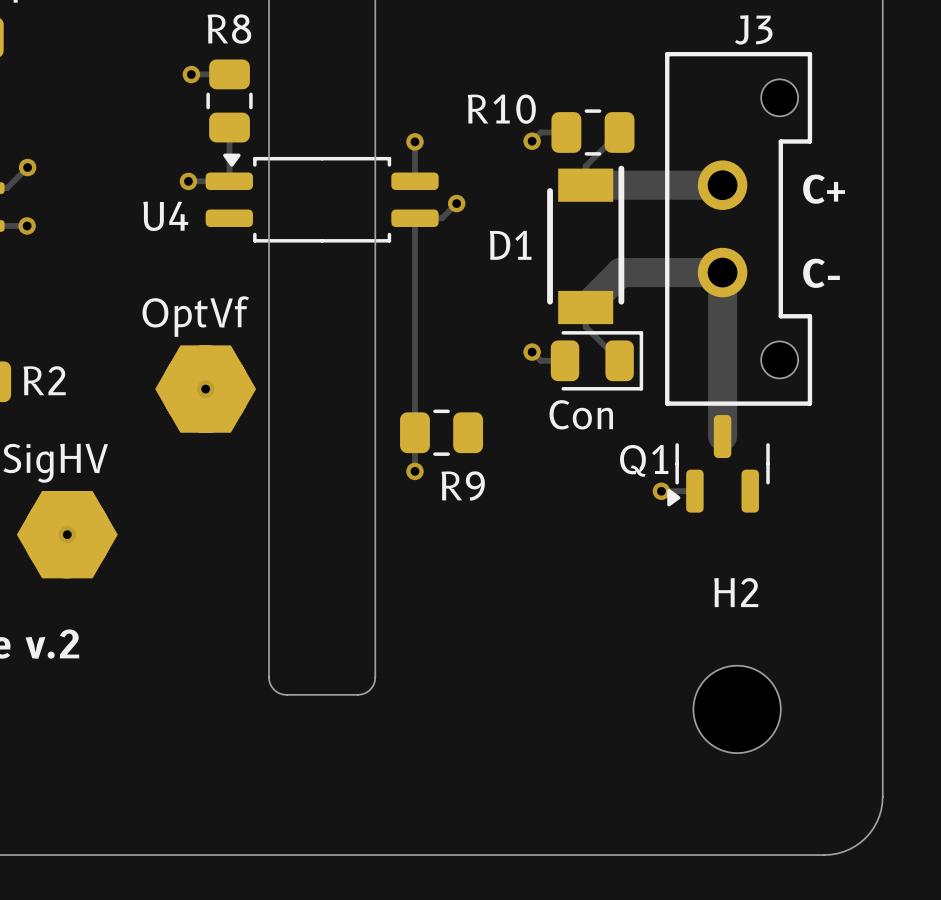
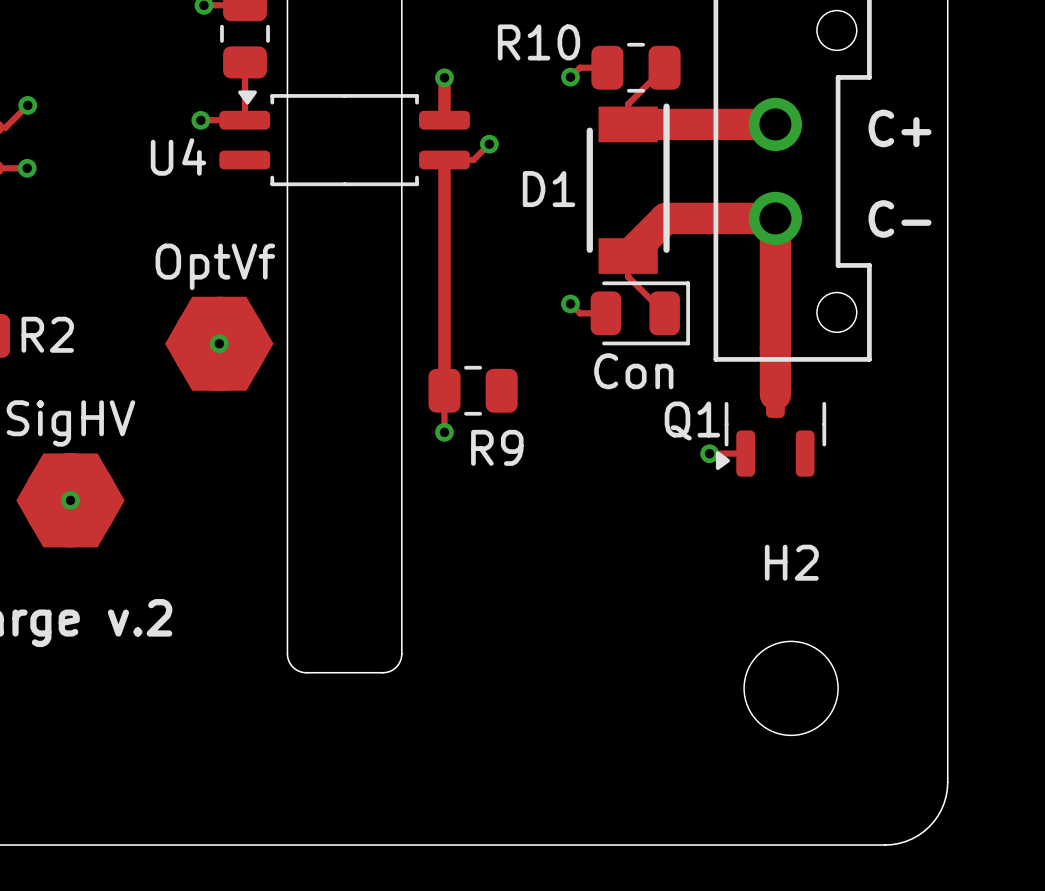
track width: thin (414, 141) (414, 181) -> thick (444, 77) (444, 120)
track width: thin (414, 218) (414, 447) -> thick (444, 160) (444, 406)

